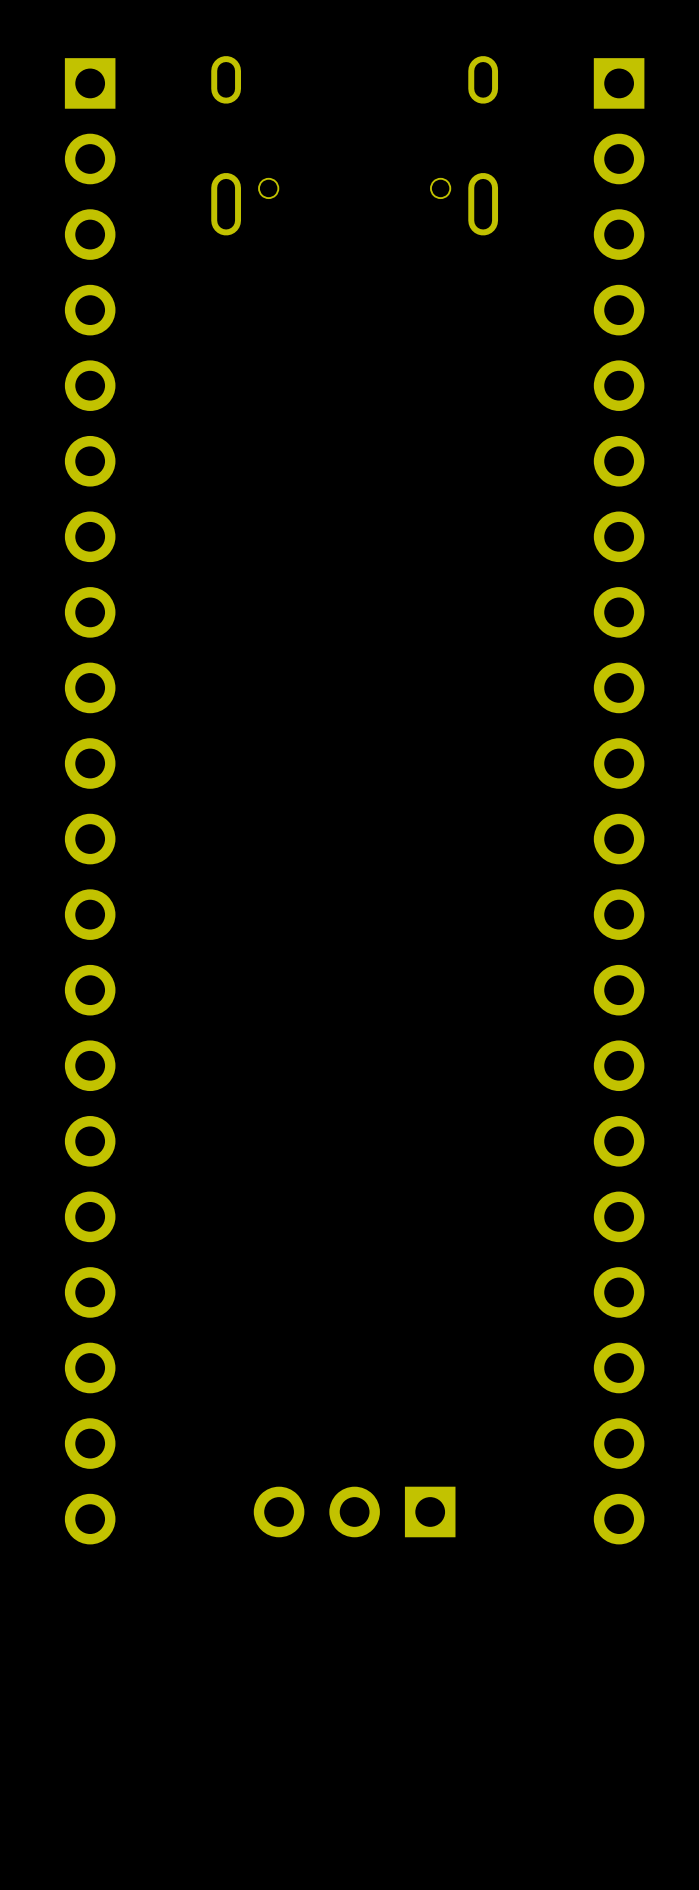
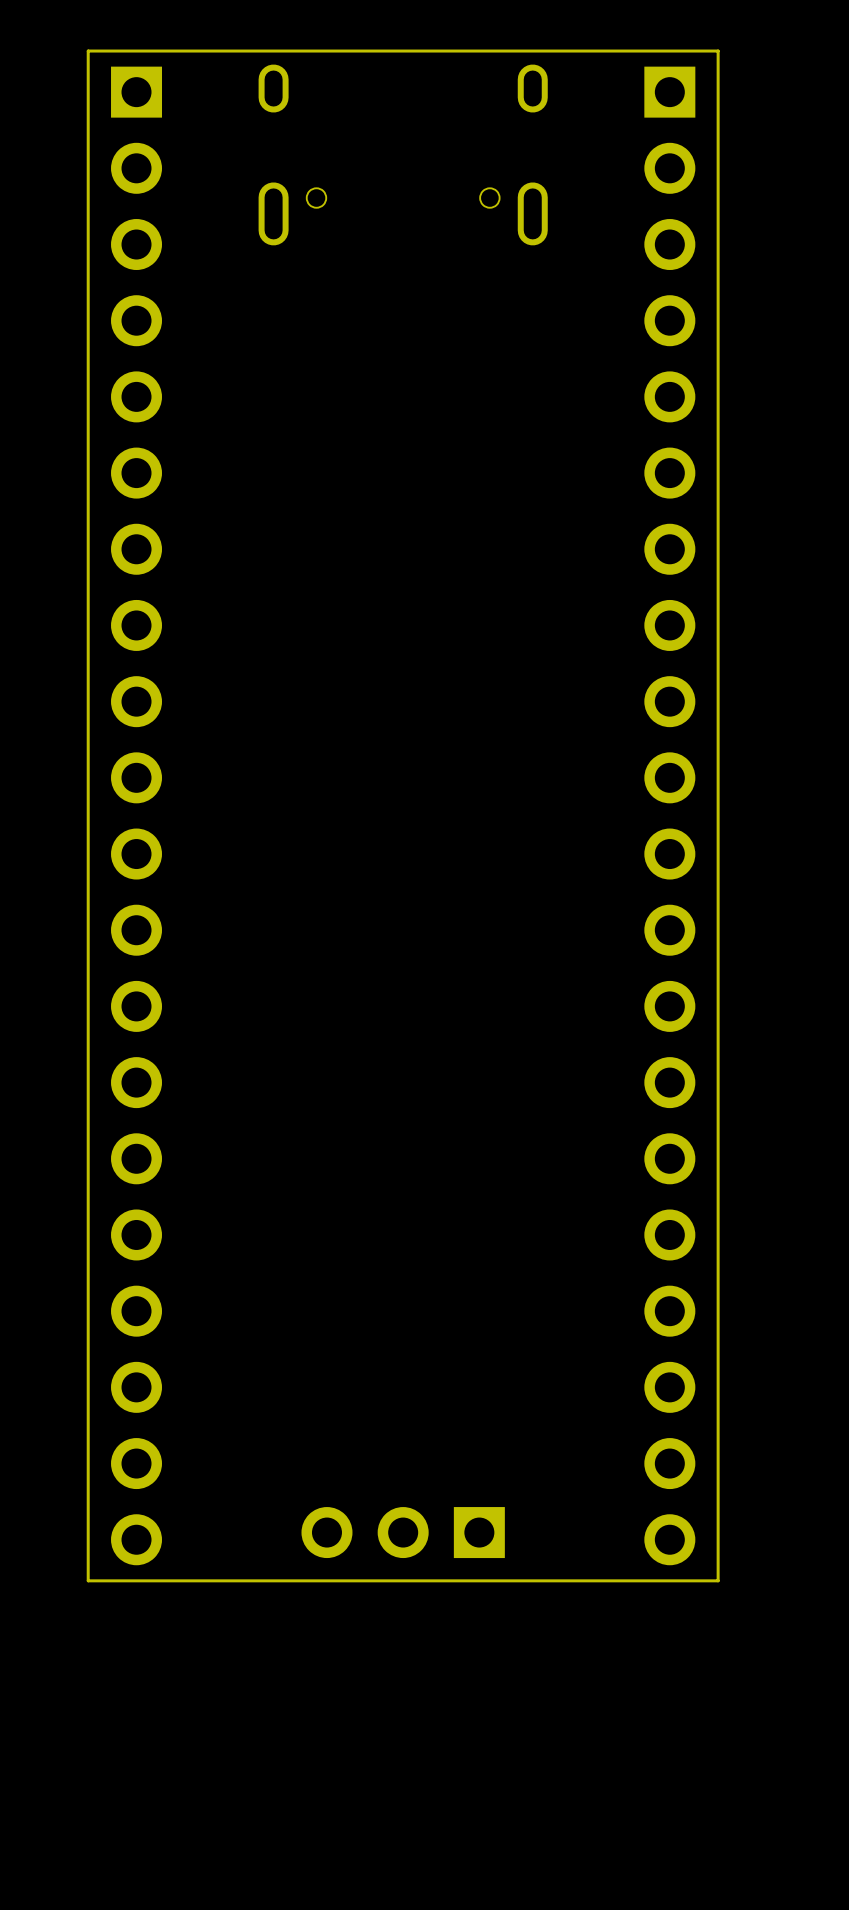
board edge: none -> (718, 51) (88, 51) (88, 1580) (718, 1580) (718, 51)

